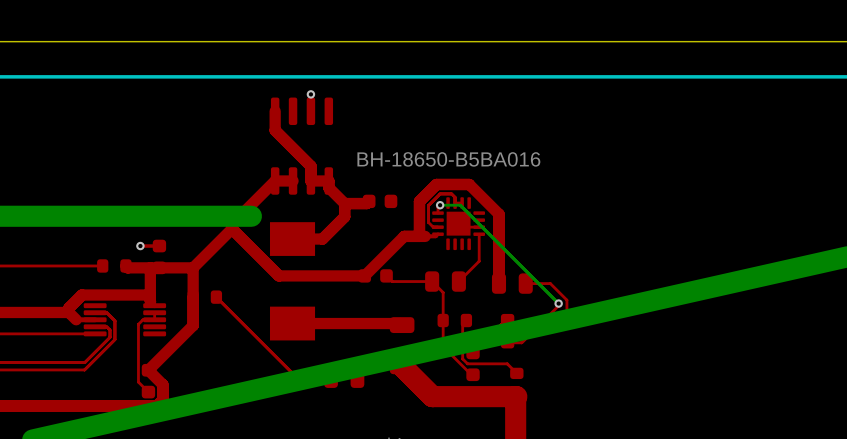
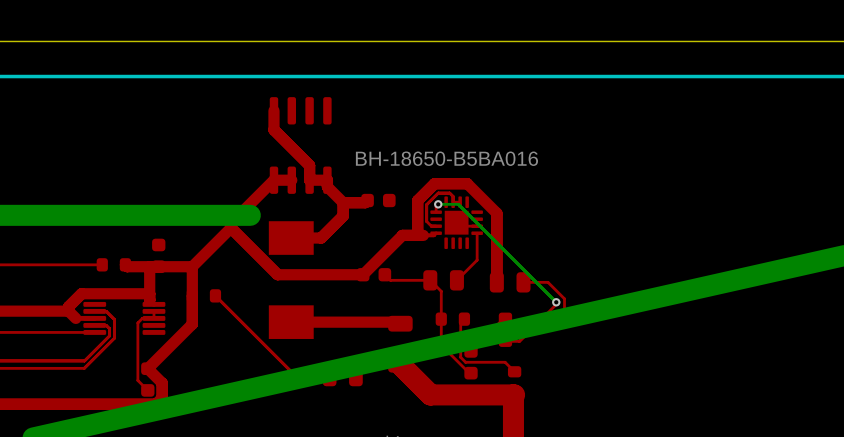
via: (310, 94) -> none
via: (140, 246) -> none
top track: (159, 246) (140, 246) -> none

